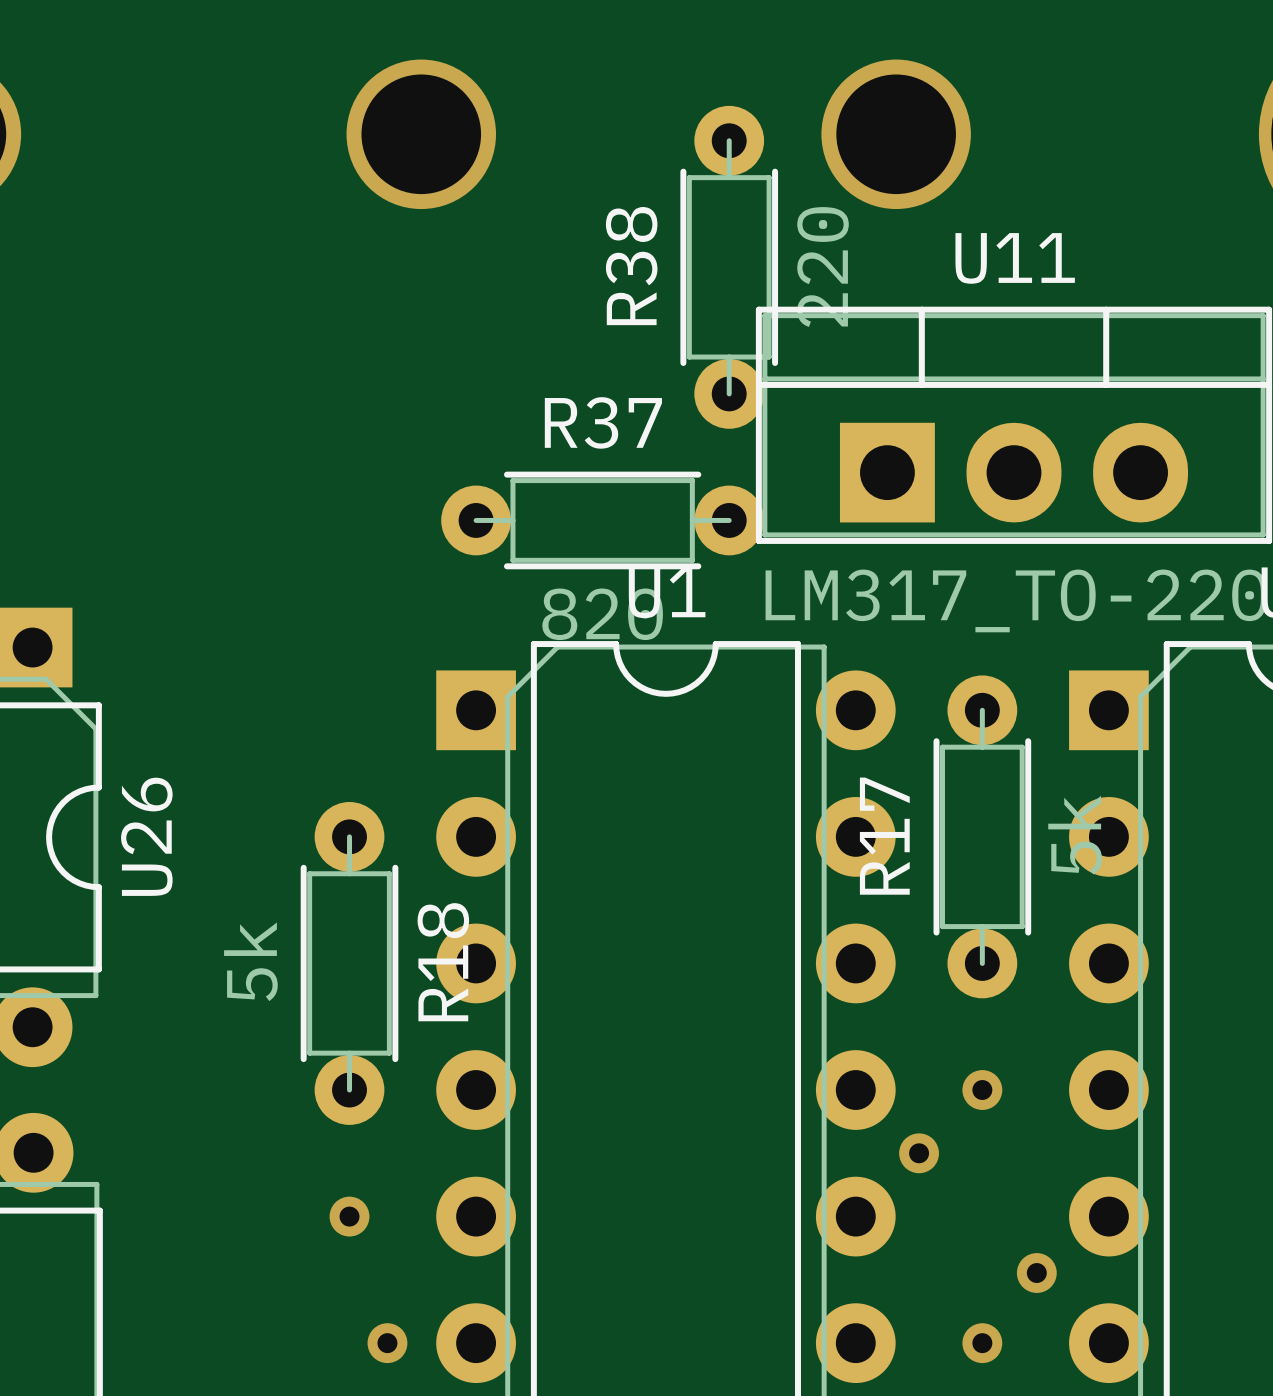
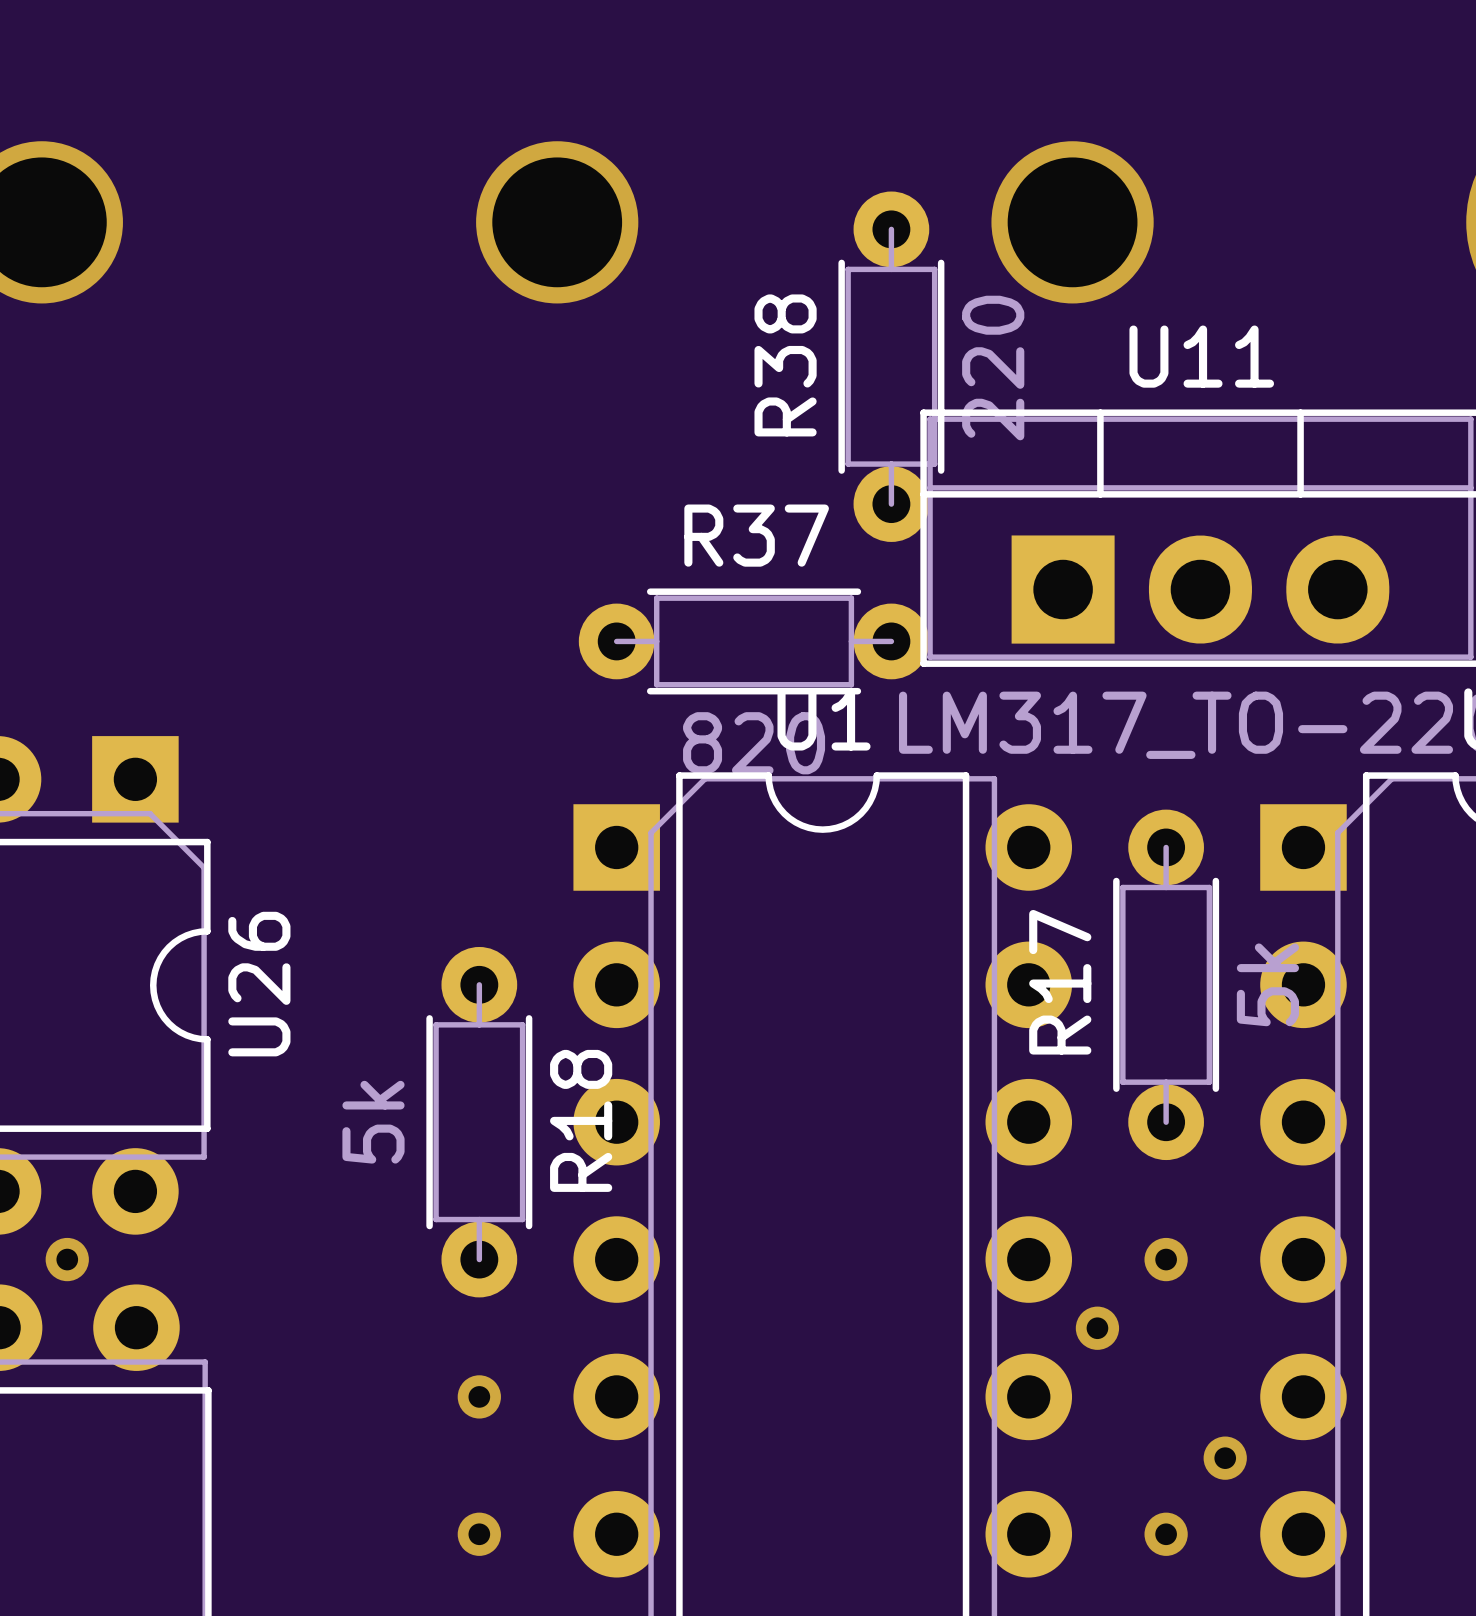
via position: (387, 1343) -> (479, 1534)

